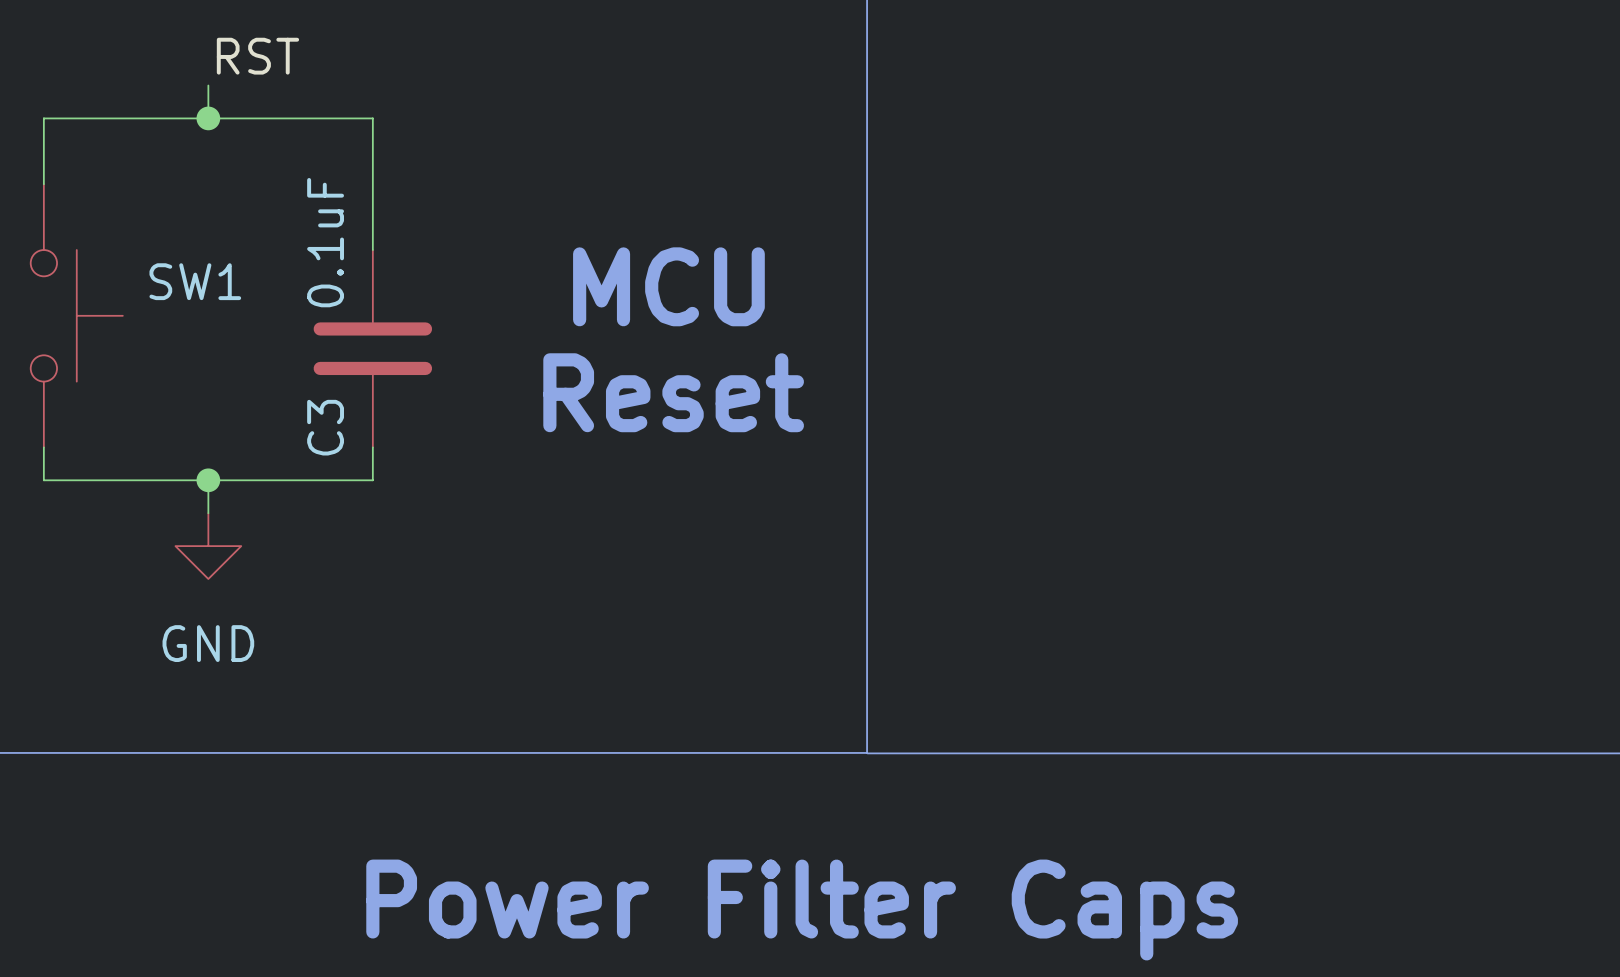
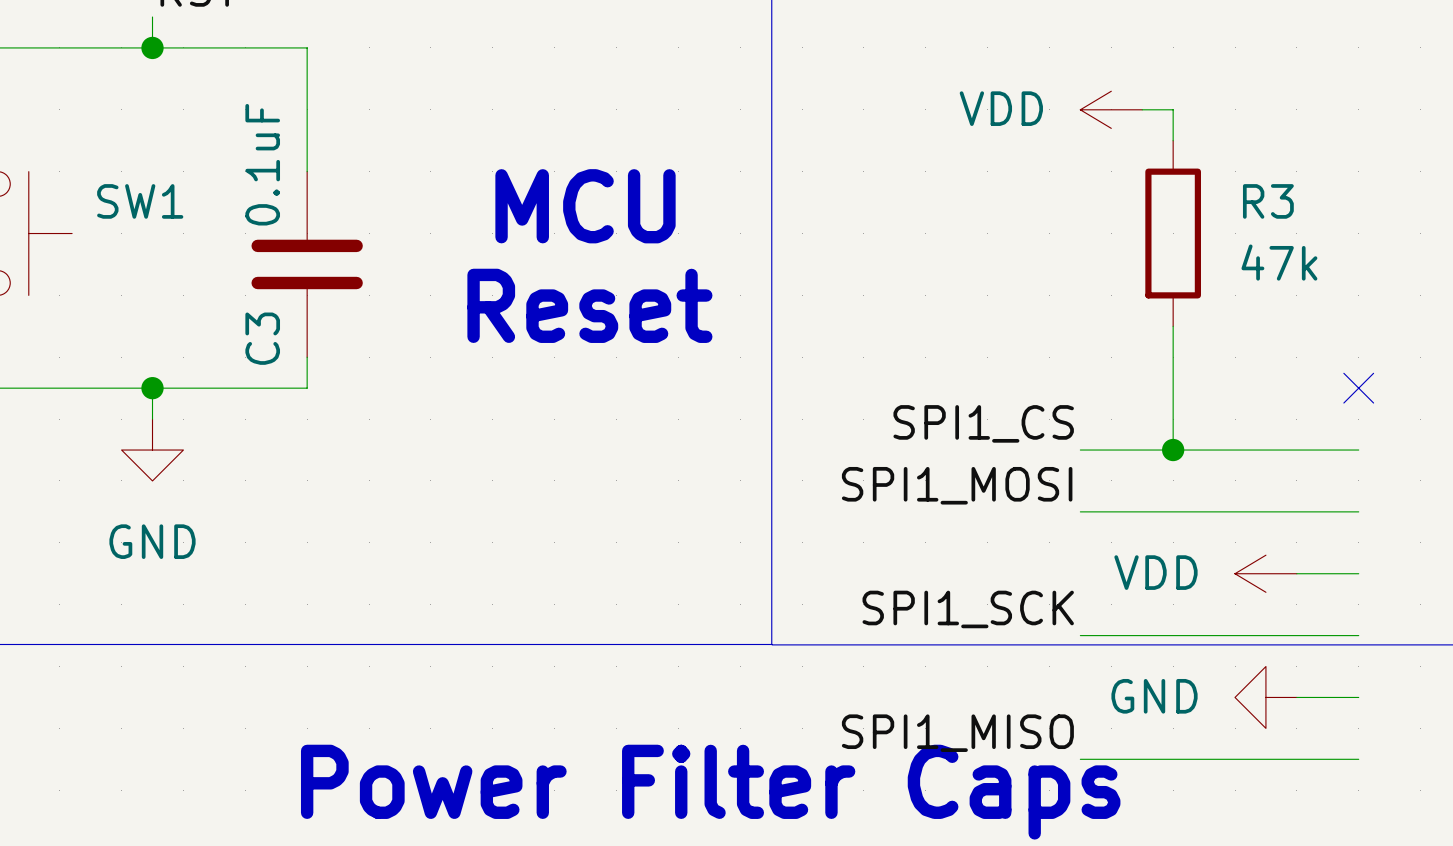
power symbol: none -> VDD (1111, 109)
wire: none -> (1142, 109) (1173, 109) (1173, 140)
R3: none -> 47k (1173, 233)
wire: none -> (1173, 326) (1173, 450)
no-connect mark: none -> (1358, 388)
label: none -> SPI1_CS (983, 423)
wire: none -> (1080, 450) (1358, 450)
junction: none -> (1173, 450)
label: none -> SPI1_MOSI (957, 485)
wire: none -> (1080, 511) (1358, 511)
power symbol: none -> VDD (1265, 573)
wire: none -> (1296, 573) (1358, 573)
label: none -> SPI1_SCK (968, 609)
wire: none -> (1080, 635) (1358, 635)
power symbol: none -> GND (1265, 697)
wire: none -> (1296, 697) (1358, 697)
label: none -> SPI1_MISO (957, 733)
wire: none -> (1080, 759) (1358, 759)

